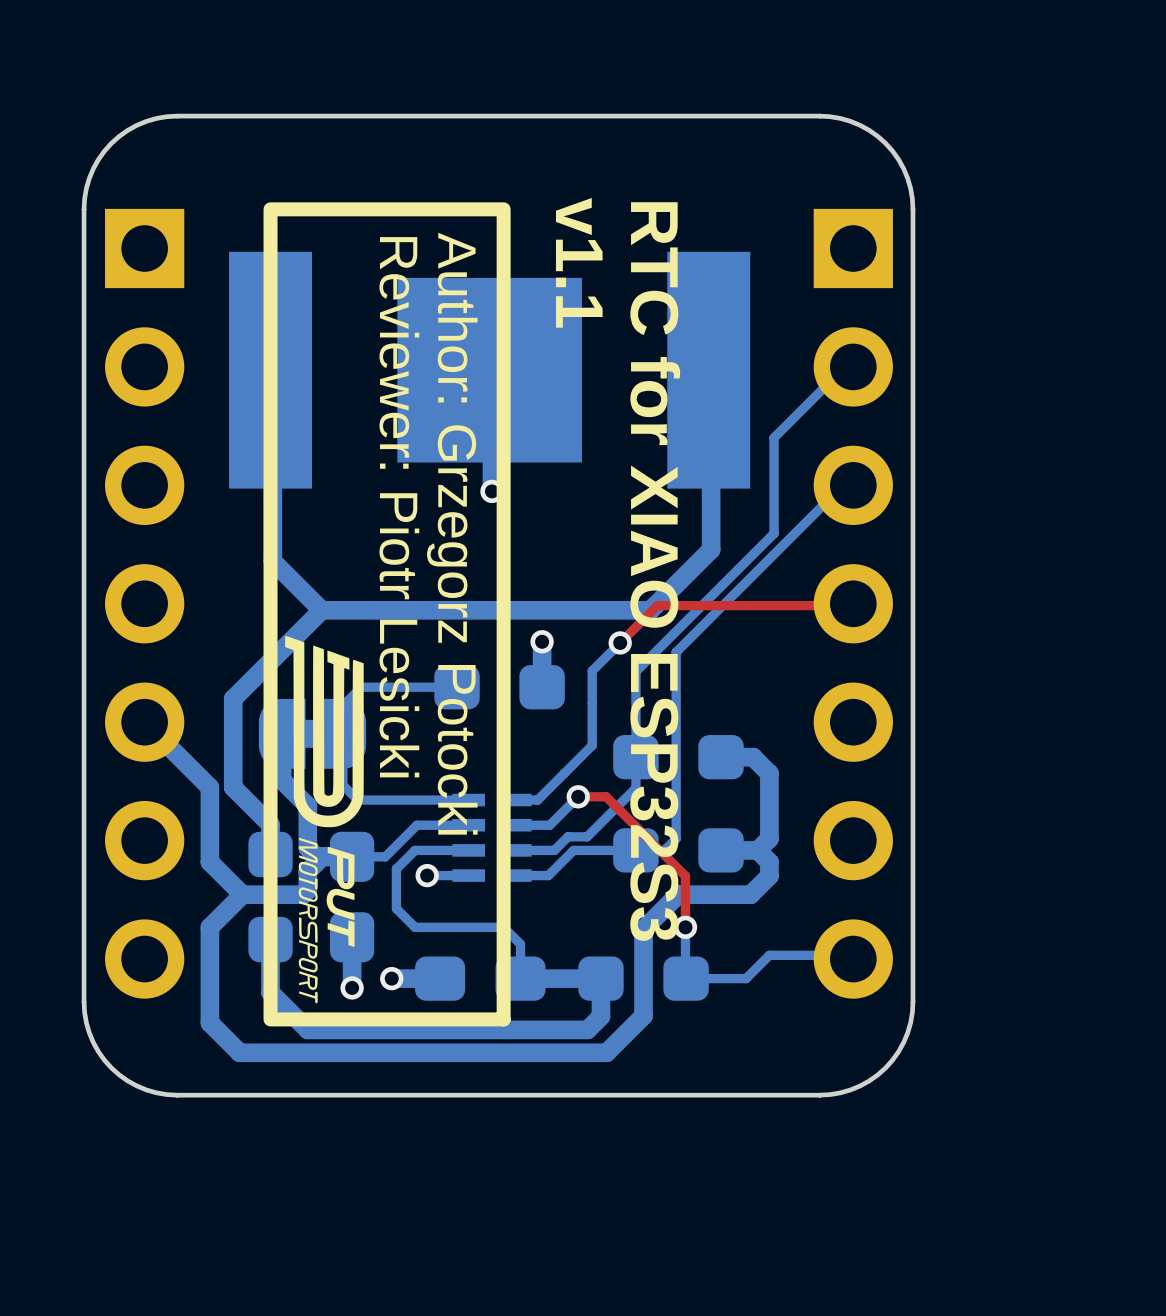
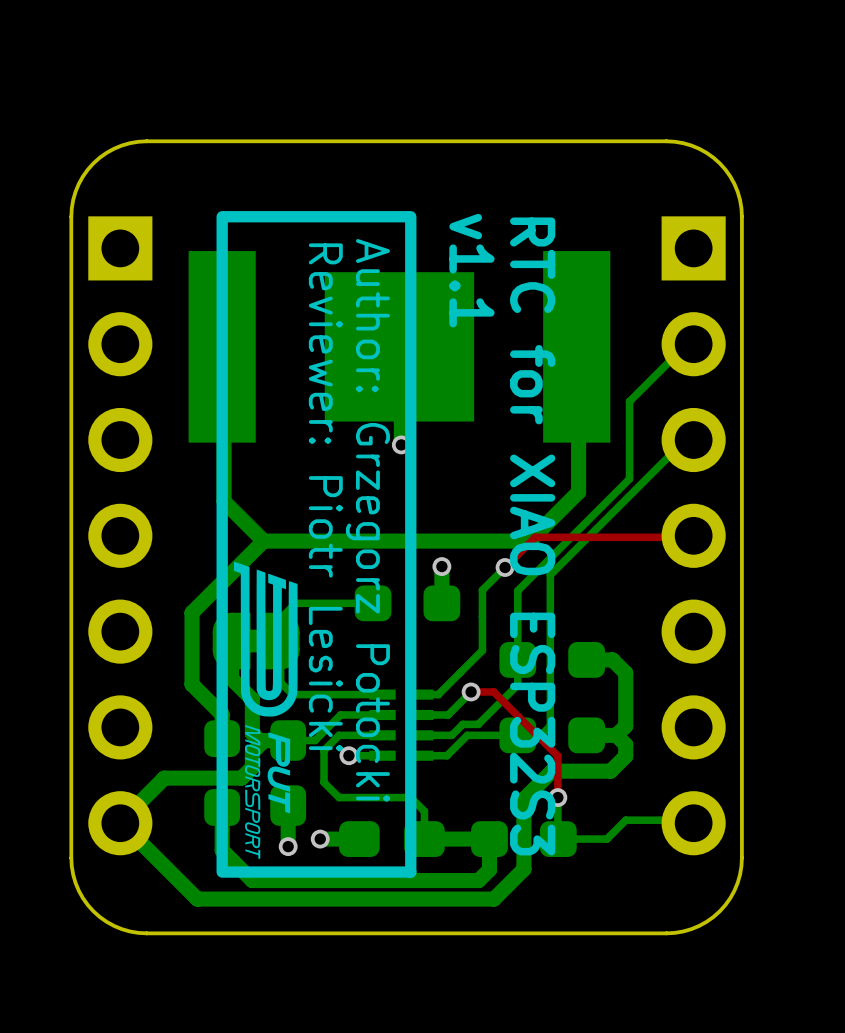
bottom track: (144, 722) (209, 787) (209, 862) (242, 894) -> none
bottom track: (242, 894) (209, 927) (209, 1022) -> (248, 771) (241, 778) (164, 778) (120, 822) (173, 874)
bottom track: (242, 894) (303, 894) -> none

